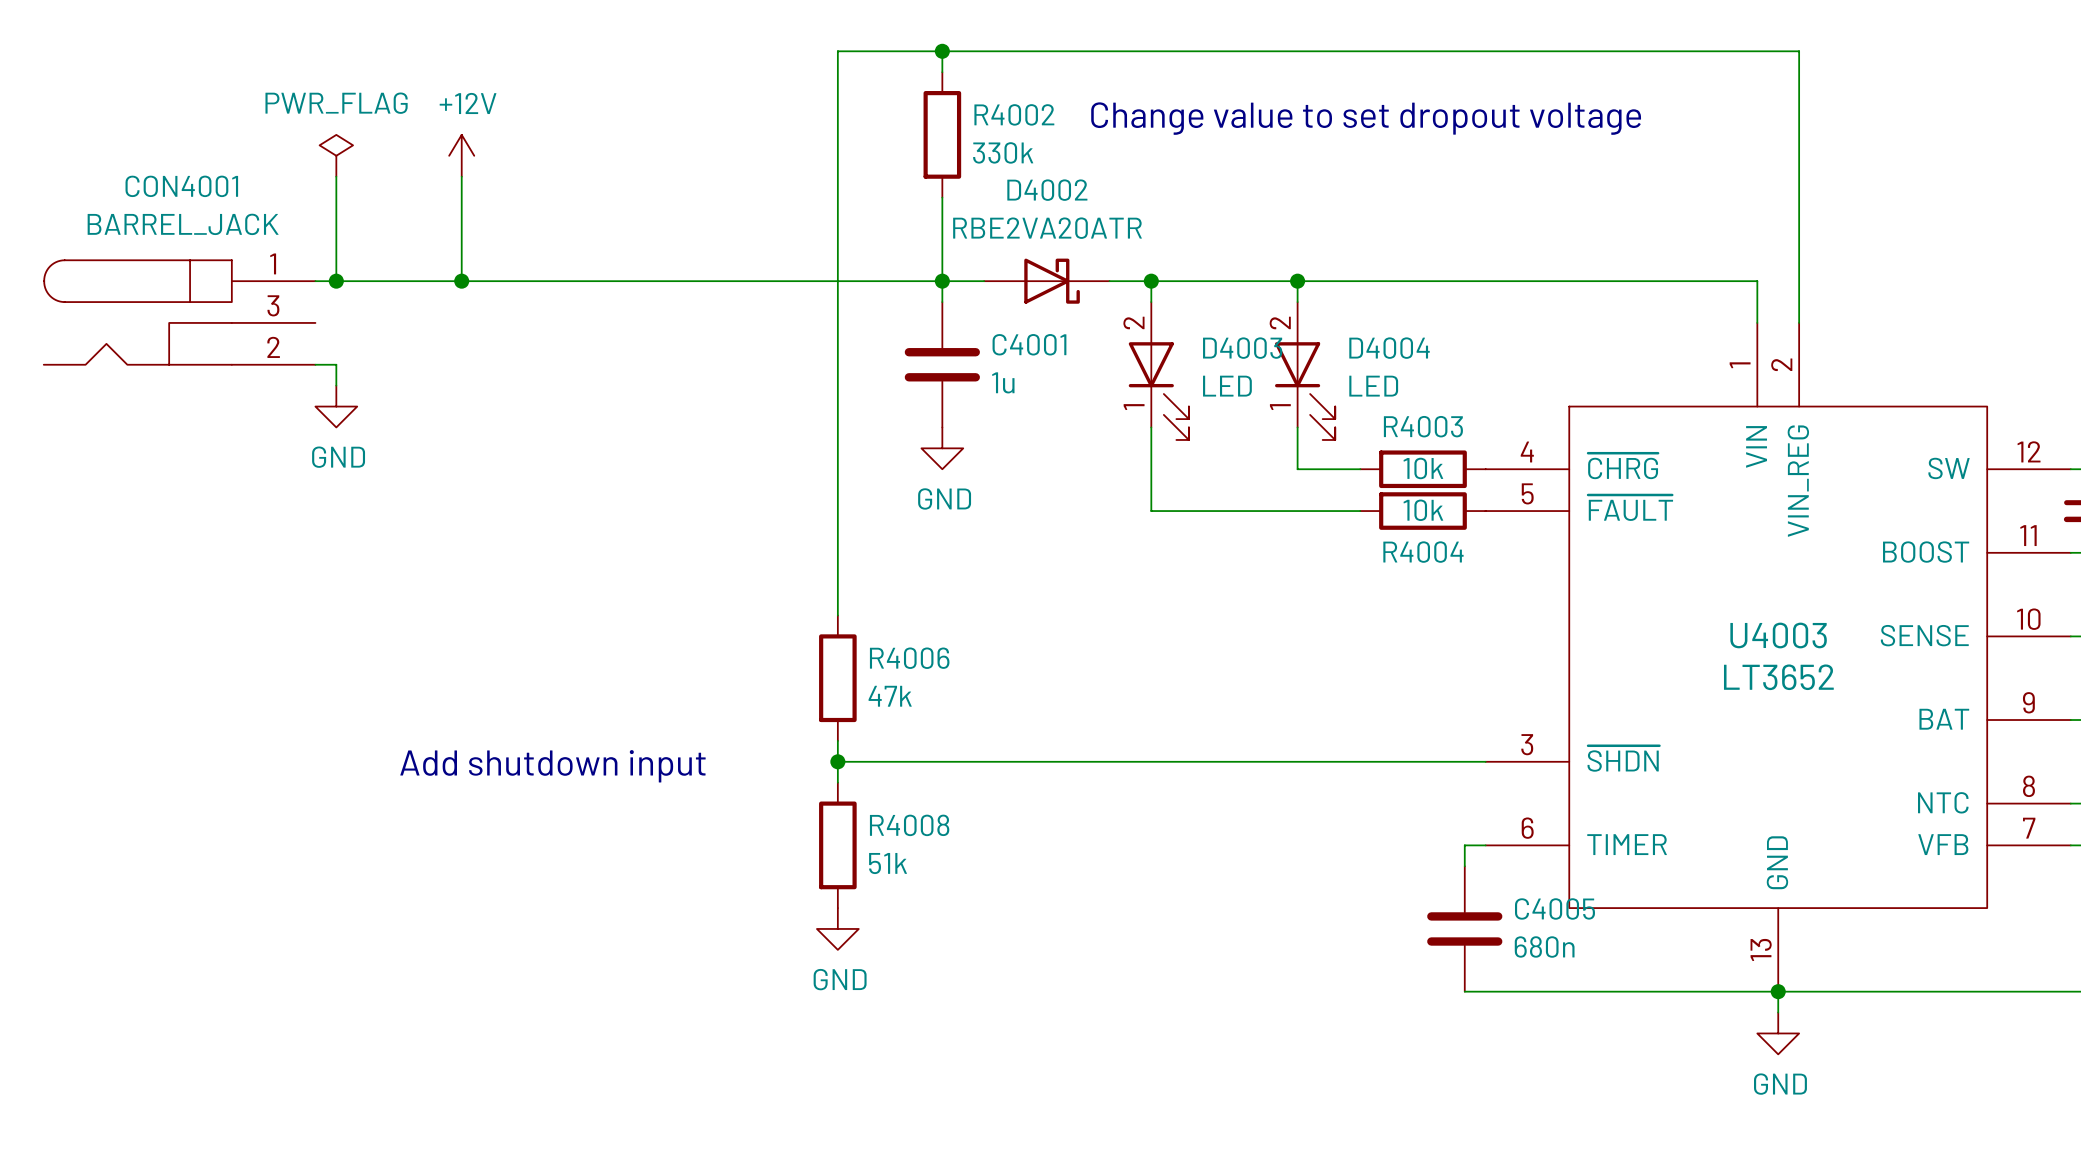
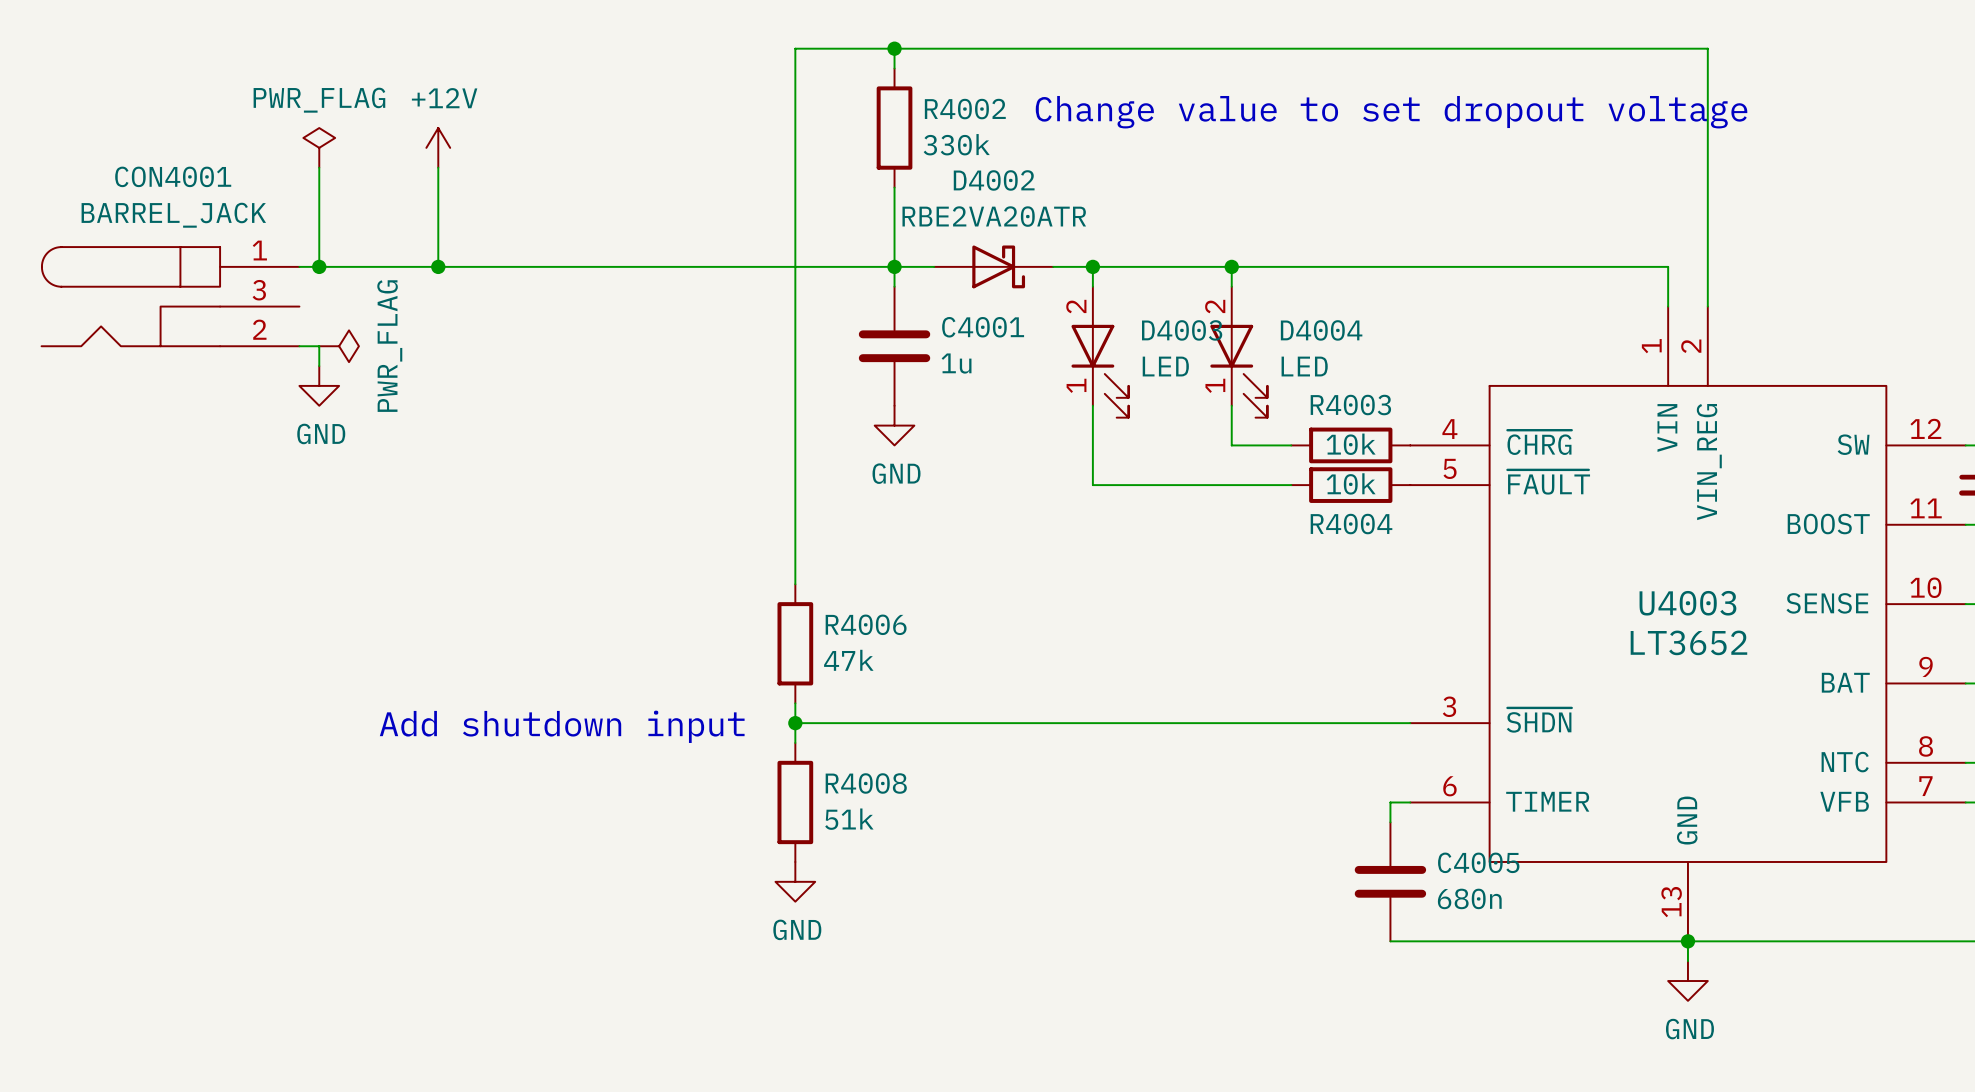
power symbol: none -> PWR_FLAG (339, 346)

